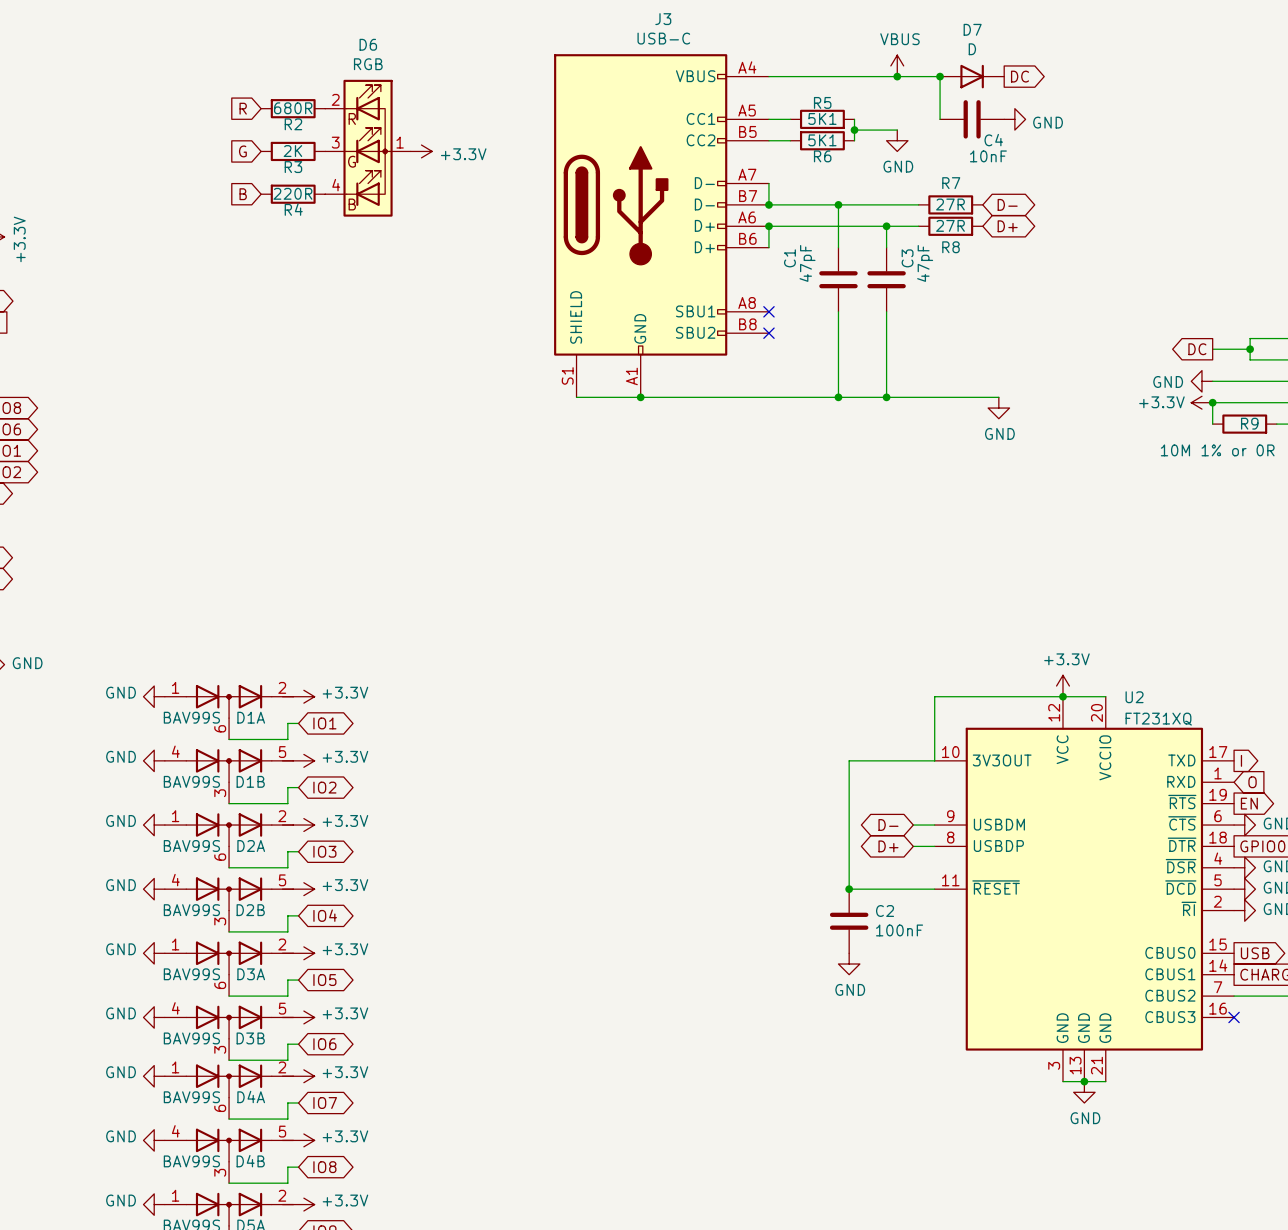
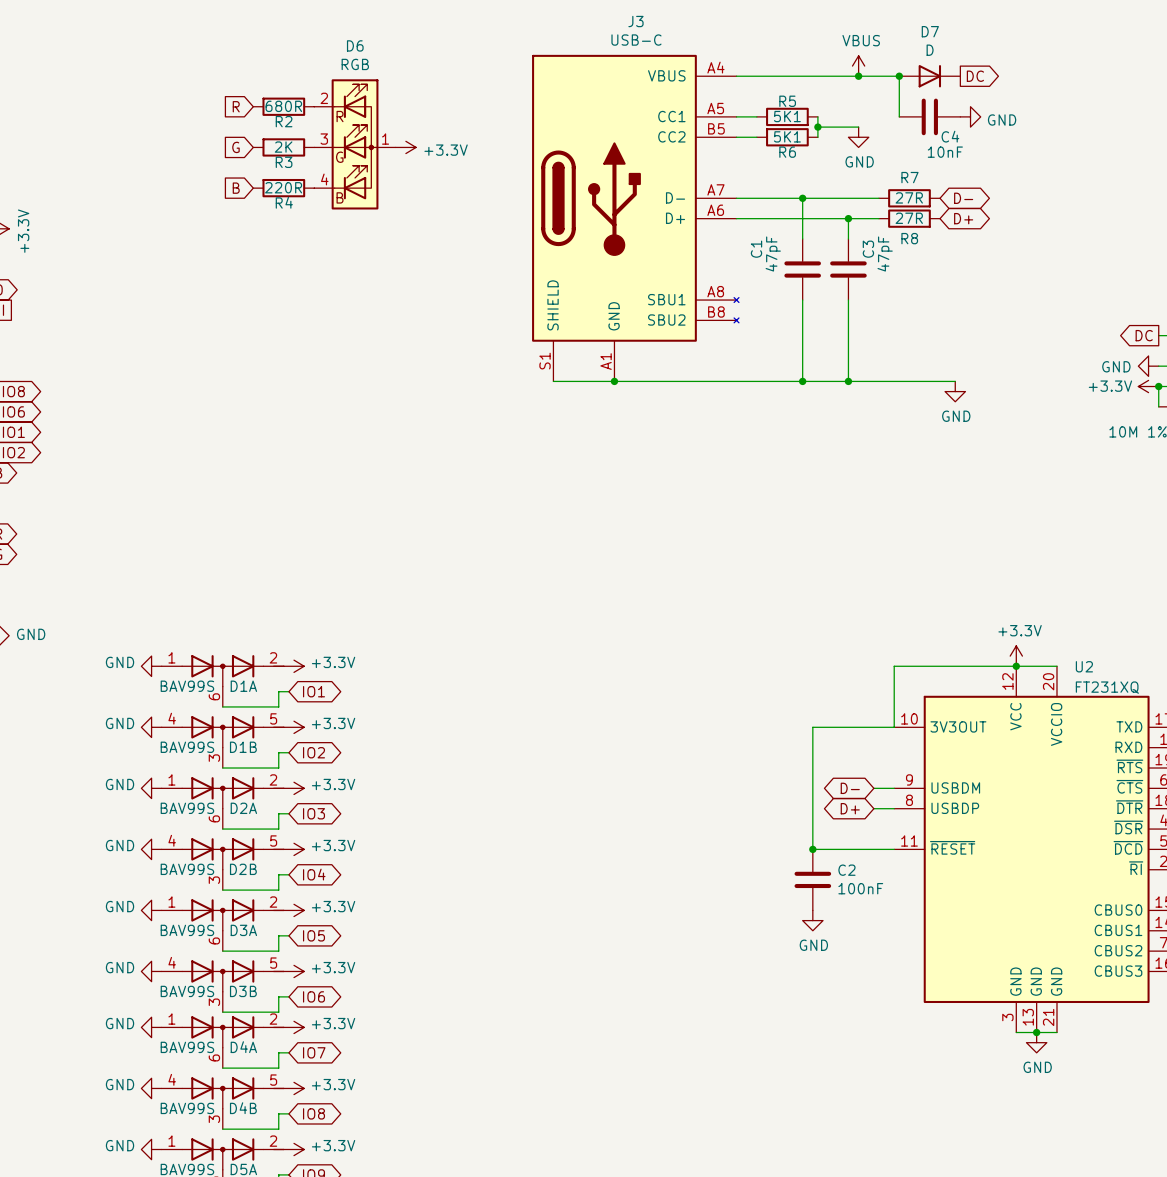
J3 symbol: [554, 54, 769, 398] -> [532, 54, 739, 382]
wire: (768, 183) (768, 204) -> none
junction: (768, 204) -> none
wire: (768, 226) (768, 247) -> none
junction: (768, 226) -> none
no-connect mark: (768, 311) -> none
no-connect mark: (768, 333) -> none

